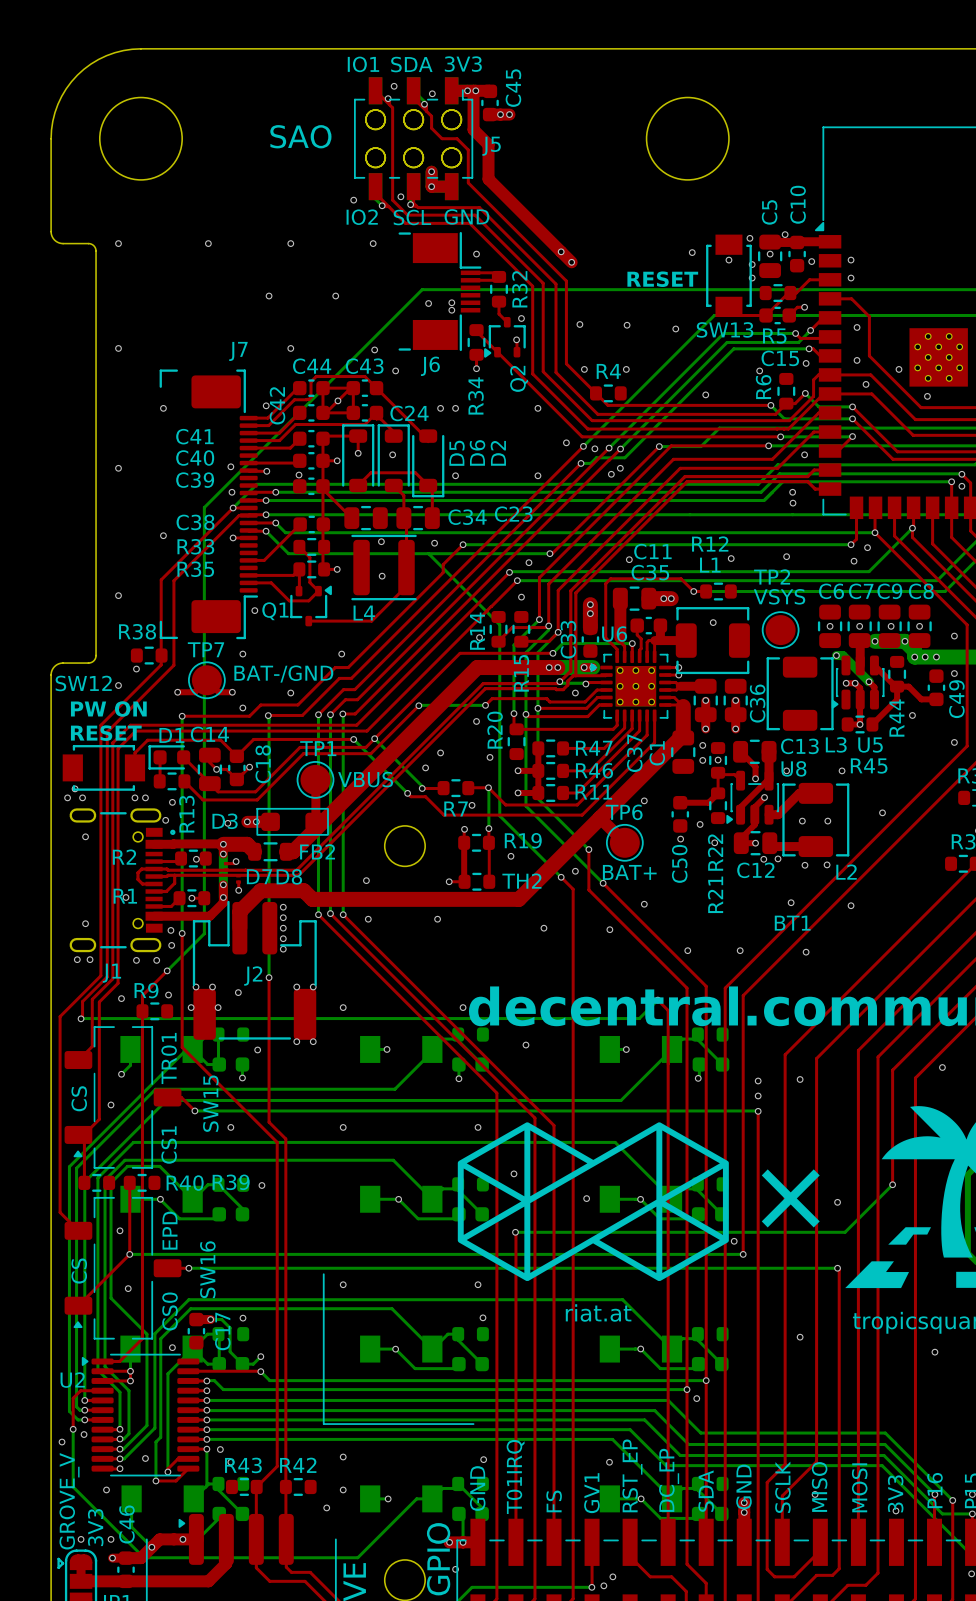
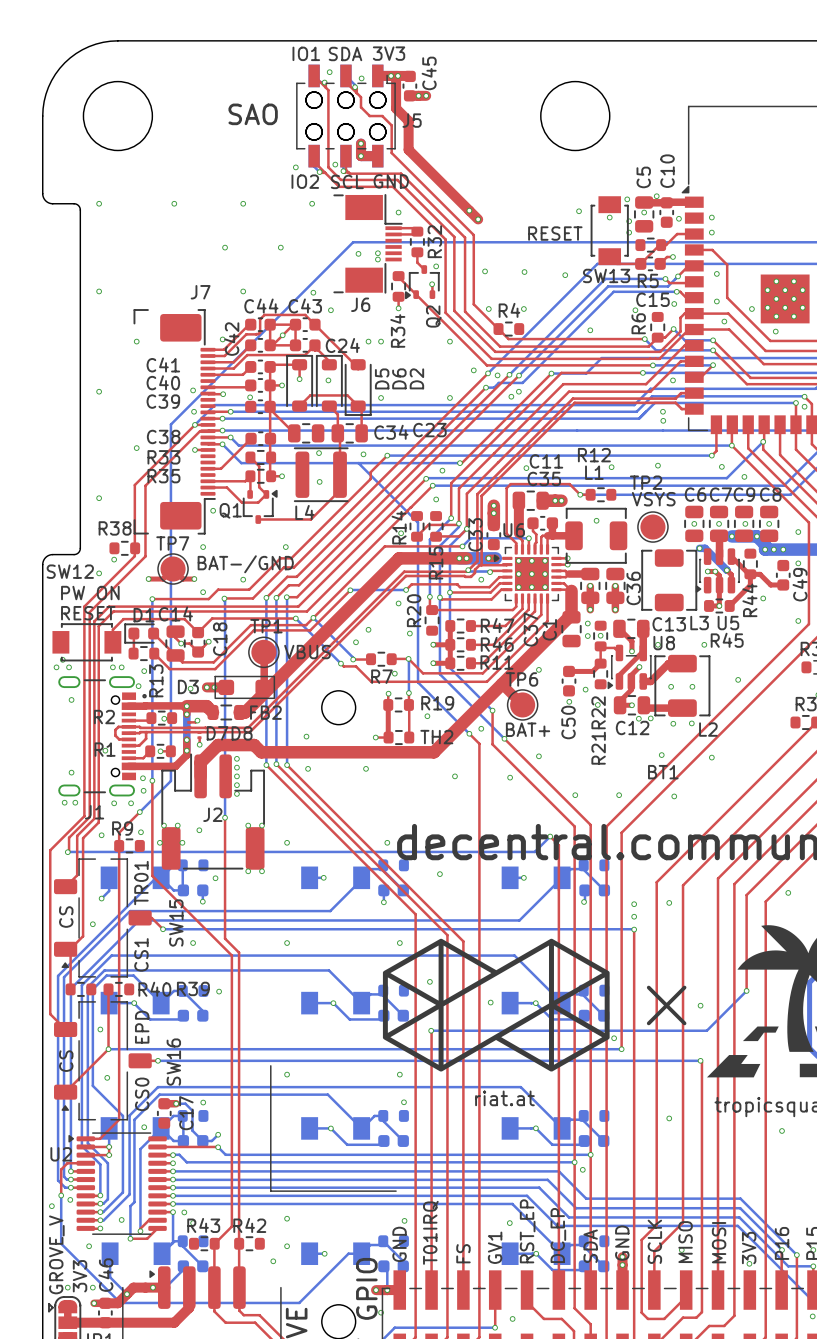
via: (867, 547) -> none
via: none -> (721, 466)
via: (854, 561) -> none
via: none -> (744, 476)
via: (603, 1585) -> none

